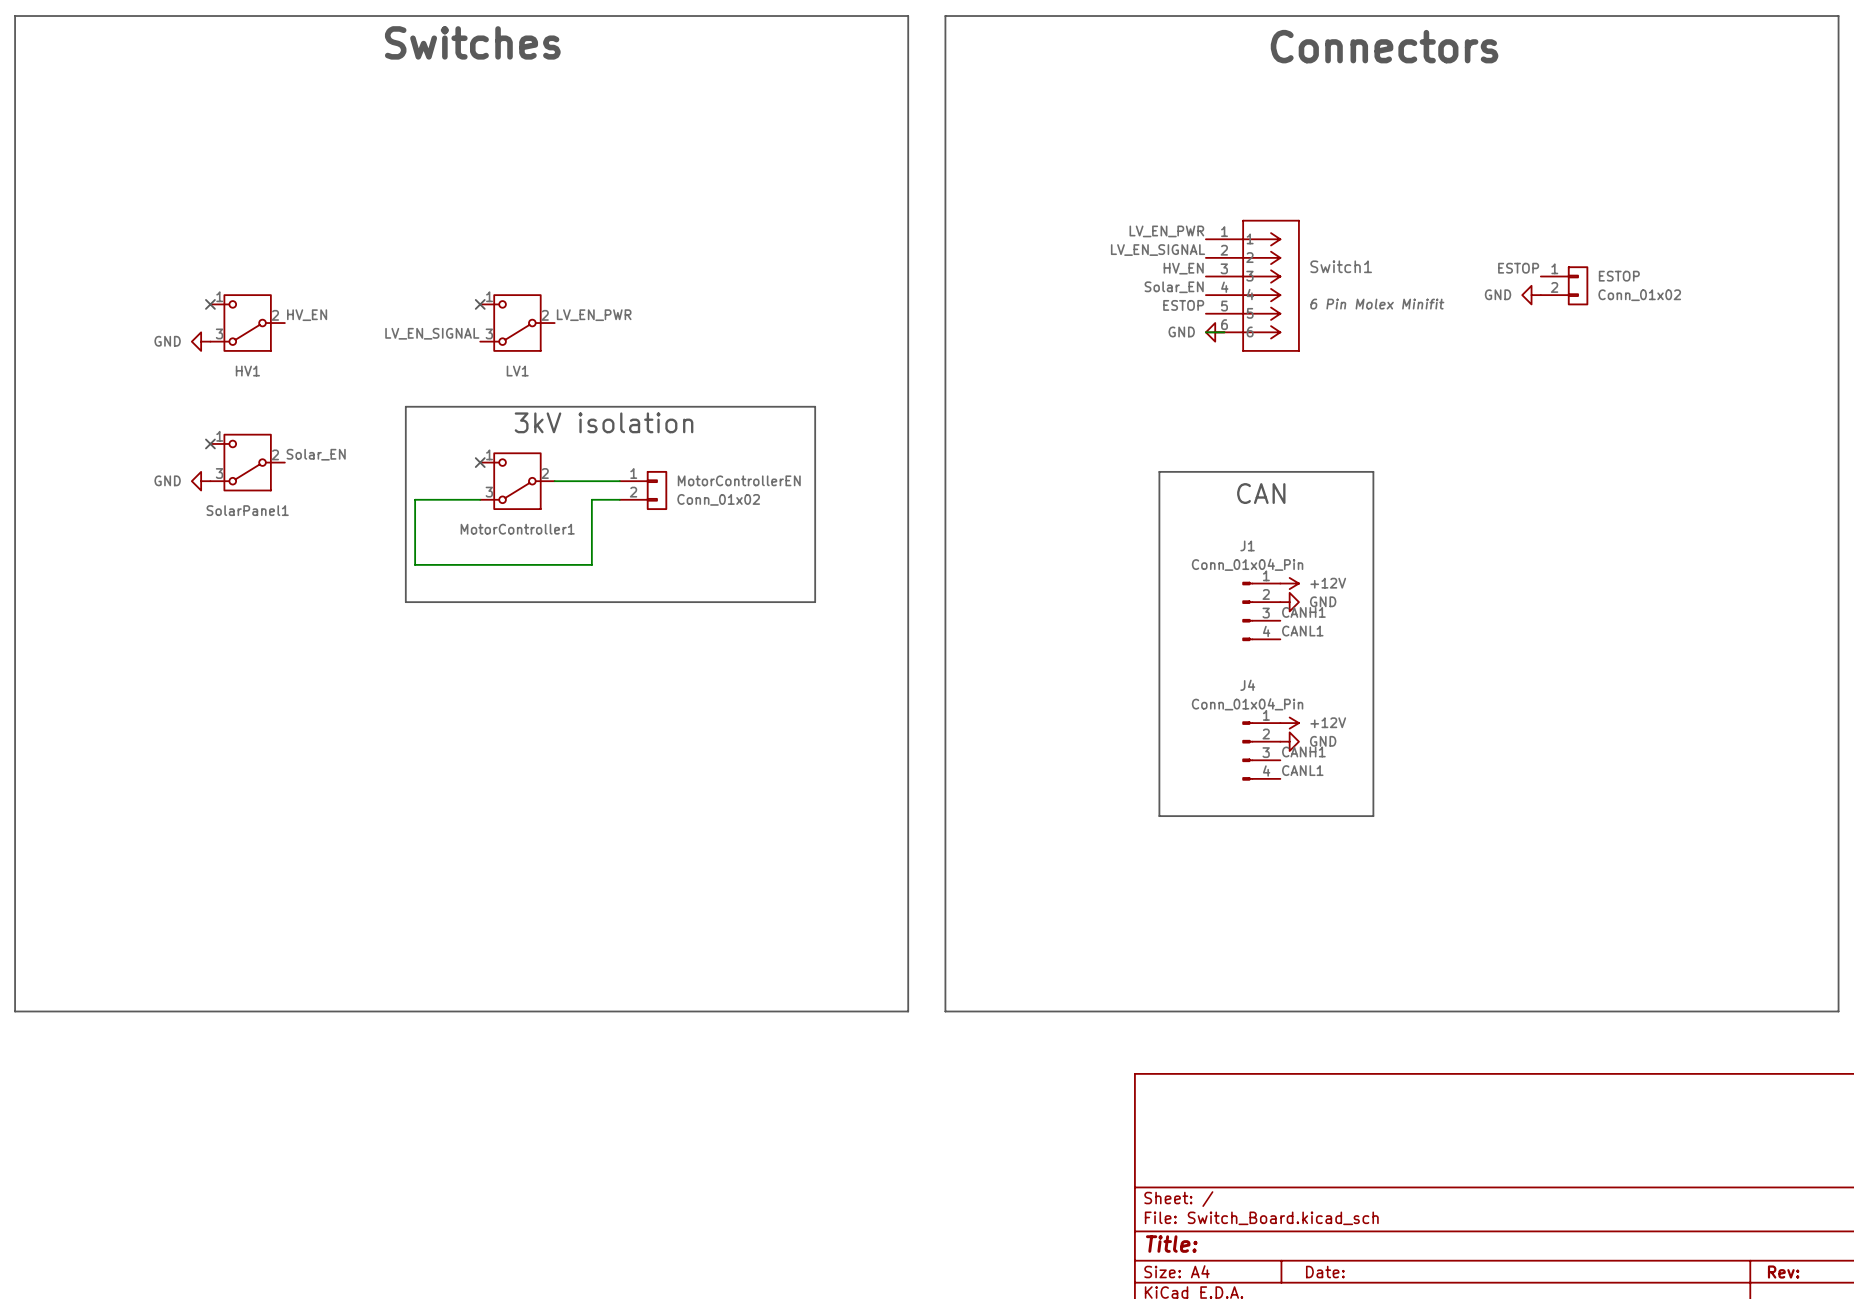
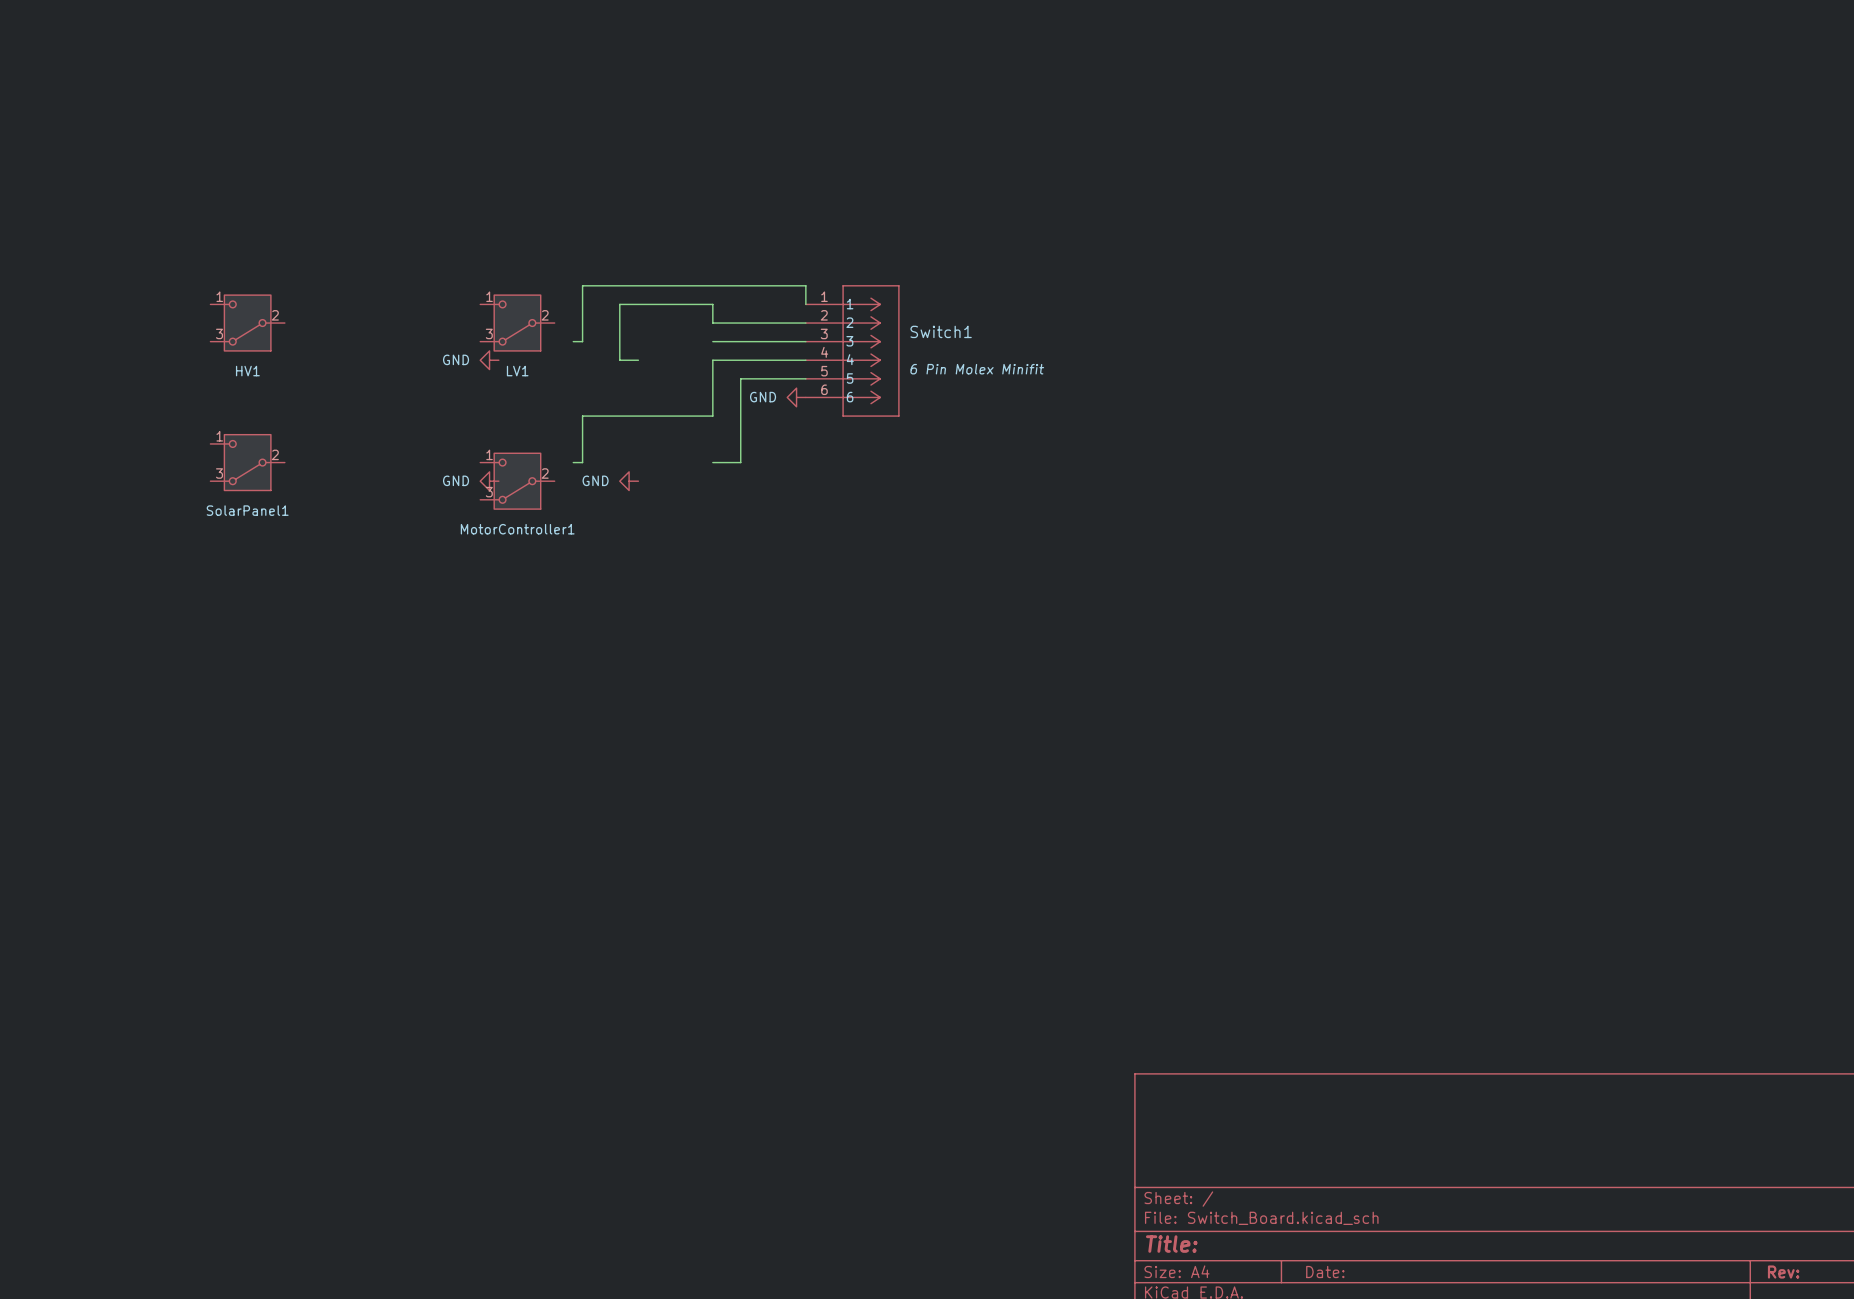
line: (15, 16) (908, 16) (908, 1011) (15, 1011) (15, 16) -> none
line: (945, 16) (1838, 16) (1838, 1011) (945, 1011) (945, 16) -> none
text: Switches (472, 42) -> none
text: Connectors (1384, 46) -> none
label: LV_EN_PWR (1166, 231) -> none
label: LV_EN_SIGNAL (1158, 250) -> none
label: HV_EN (1183, 268) -> none
label: ESTOP (1518, 268) -> none
Switch1 position: (1252, 285) -> (852, 350)
ESTOP: Conn_01x02 (1564, 285) -> none
label: Solar_EN (1174, 287) -> none
power symbol: GND (1531, 295) -> none
no-connect mark: (210, 304) -> none
no-connect mark: (480, 304) -> none
wire: none -> (805, 304) (805, 285) (582, 285) (582, 341) (573, 341)
label: ESTOP (1183, 305) -> none
label: HV_EN (307, 315) -> none
label: LV_EN_PWR (594, 315) -> none
wire: none -> (805, 323) (712, 323) (712, 304) (619, 304) (619, 360) (638, 360)
wire: (1205, 332) (1224, 332) -> none
power symbol: GND (1215, 332) -> none
label: LV_EN_SIGNAL (432, 333) -> none
power symbol: GND (201, 341) -> none
wire: none -> (712, 341) (805, 341)
power symbol: none -> GND (489, 360)
wire: none -> (805, 360) (712, 360) (712, 416) (582, 416) (582, 462) (573, 462)
wire: none -> (805, 378) (740, 378) (740, 462) (712, 462)
power symbol: none -> GND (796, 397)
line: (405, 406) (815, 406) (815, 602) (405, 602) (405, 406) -> none
text: 3kV isolation (604, 422) -> none
no-connect mark: (210, 443) -> none
label: Solar_EN (316, 454) -> none
no-connect mark: (480, 462) -> none
line: (1159, 471) (1373, 471) (1373, 816) (1159, 816) (1159, 471) -> none
power symbol: GND (201, 481) -> none
power symbol: none -> GND (489, 481)
wire: (554, 481) (619, 481) -> none
power symbol: none -> GND (629, 481)
MotorControllerEN: Conn_01x02 (643, 490) -> none
text: CAN (1261, 493) -> none
wire: (480, 499) (415, 499) (415, 564) (591, 564) (591, 499) (619, 499) -> none
power symbol: +12V (1289, 583) -> none
power symbol: GND (1289, 602) -> none
J1: Conn_01x04_Pin (1261, 611) -> none
label: CANH1 (1303, 612) -> none
label: CANL1 (1302, 631) -> none
power symbol: +12V (1289, 723) -> none
power symbol: GND (1289, 741) -> none
J4: Conn_01x04_Pin (1261, 750) -> none
label: CANH1 (1303, 751) -> none
label: CANL1 (1302, 770) -> none

